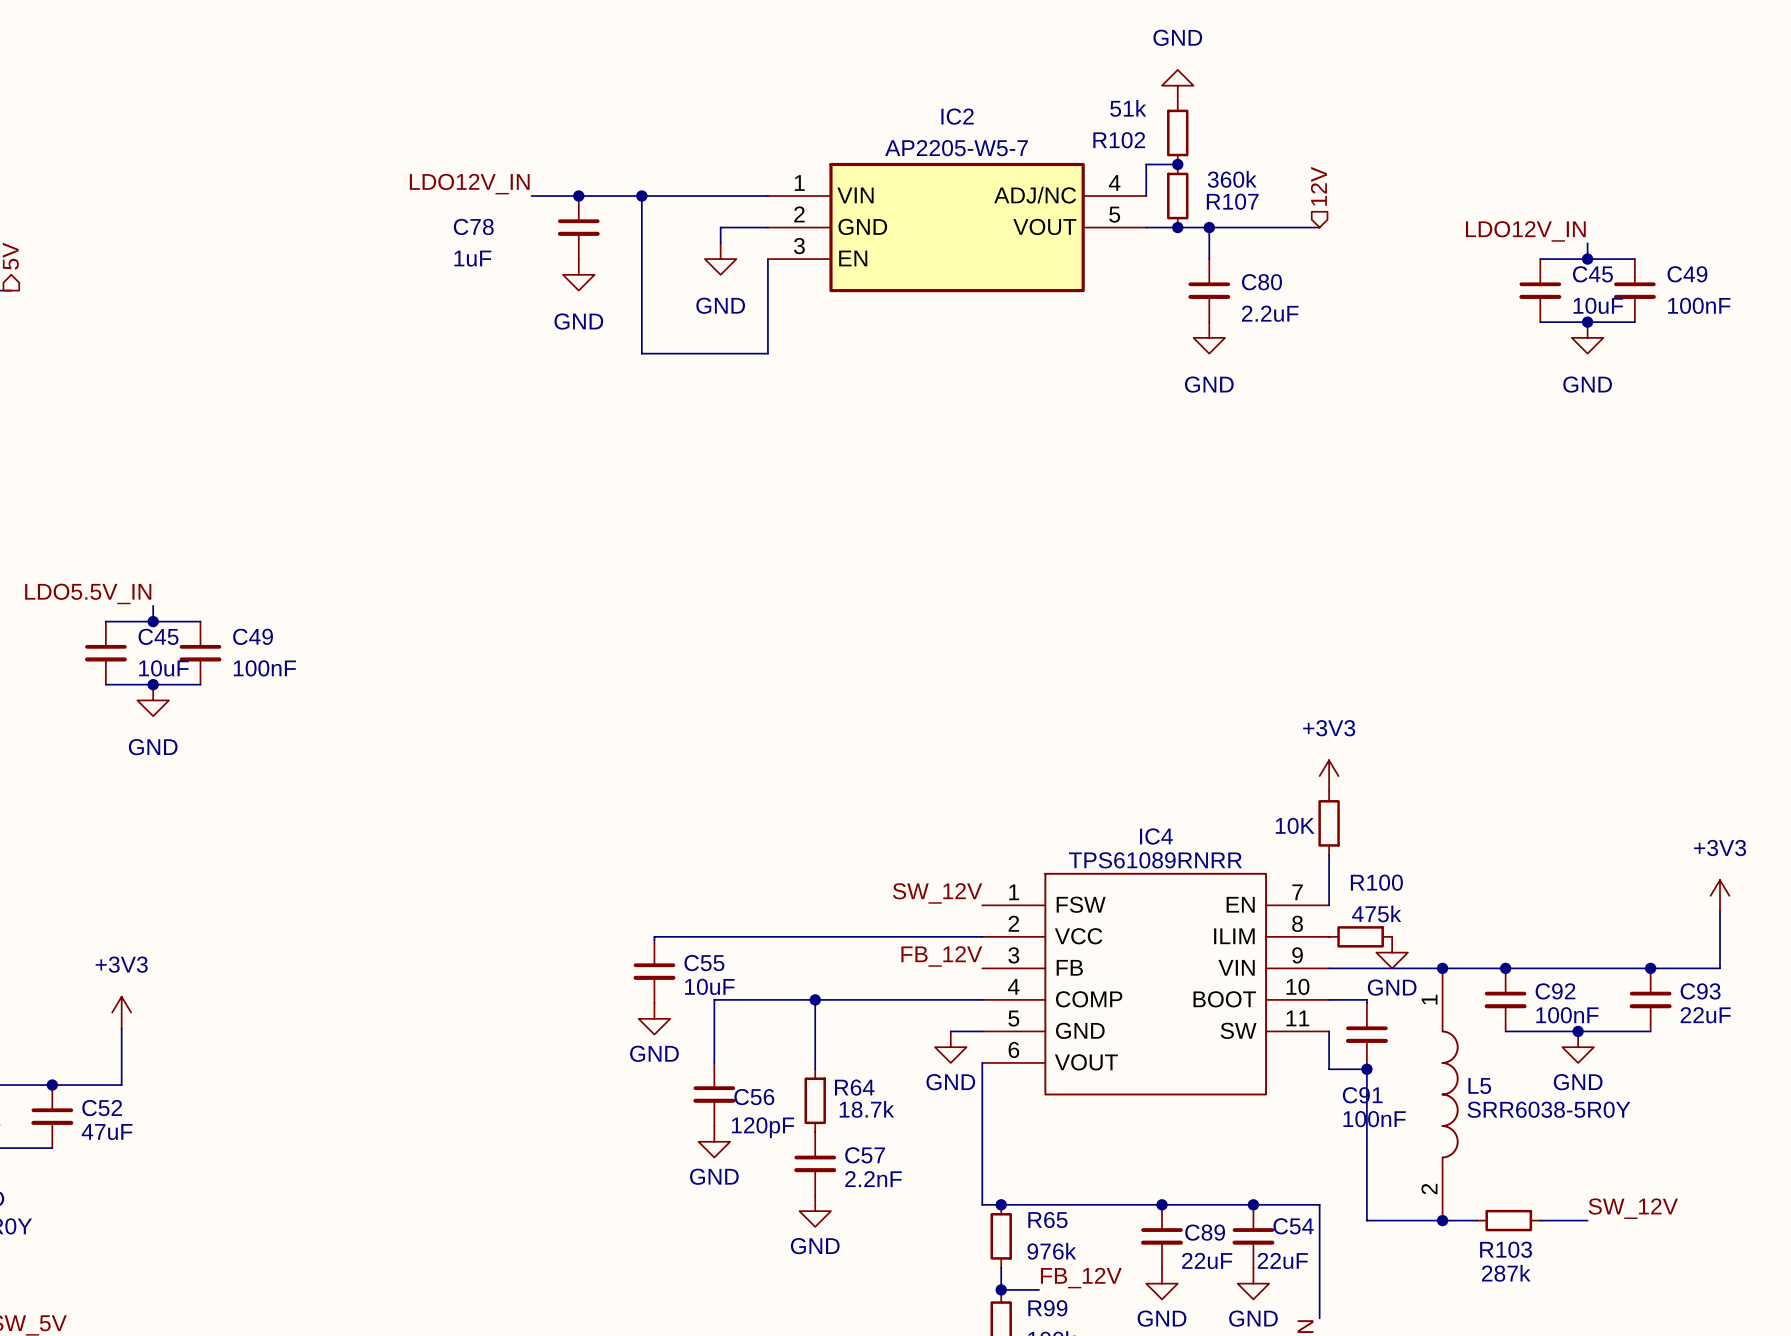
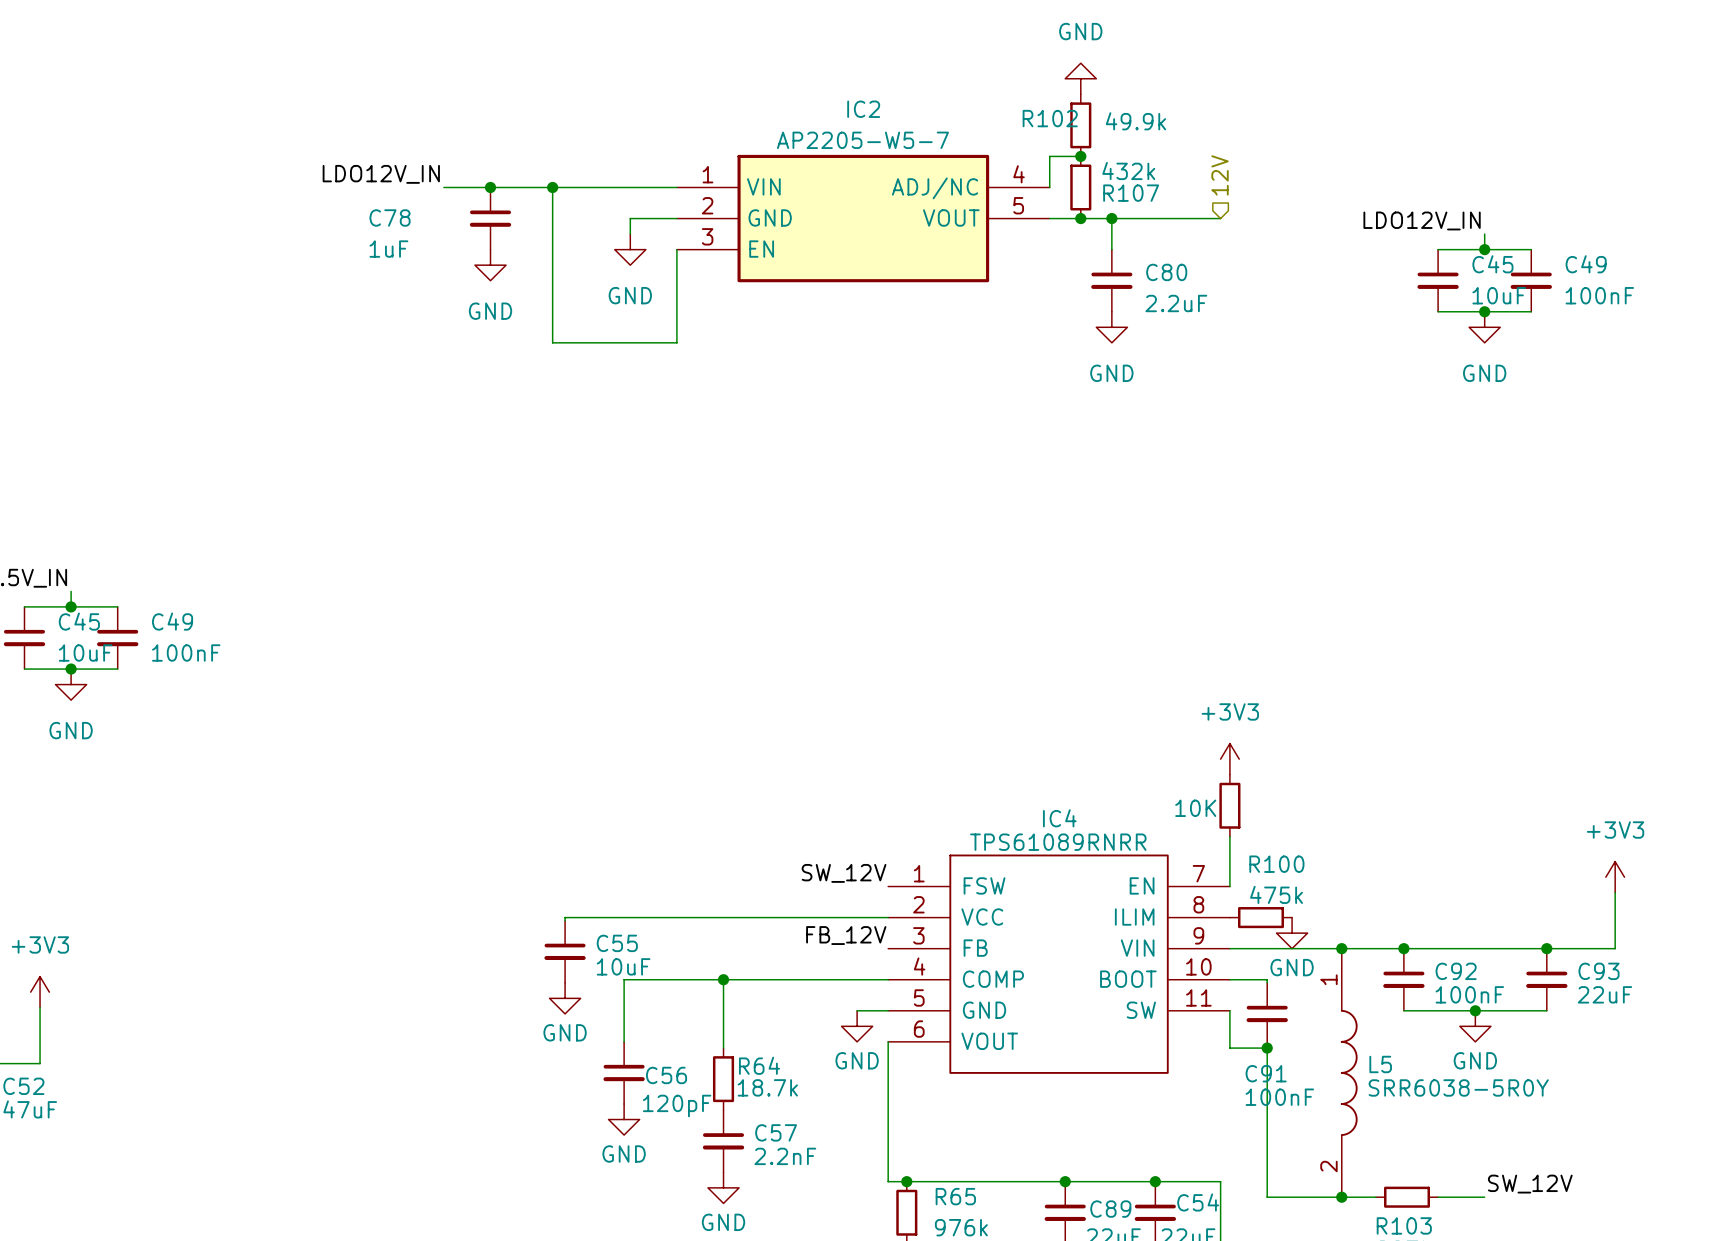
R102 value: 51k (1128, 108) -> 49.9k (1135, 121)
R102 name position: R102 (1119, 140) -> R102 (1050, 118)
R107 value: 360k (1232, 179) -> 432k (1128, 171)

